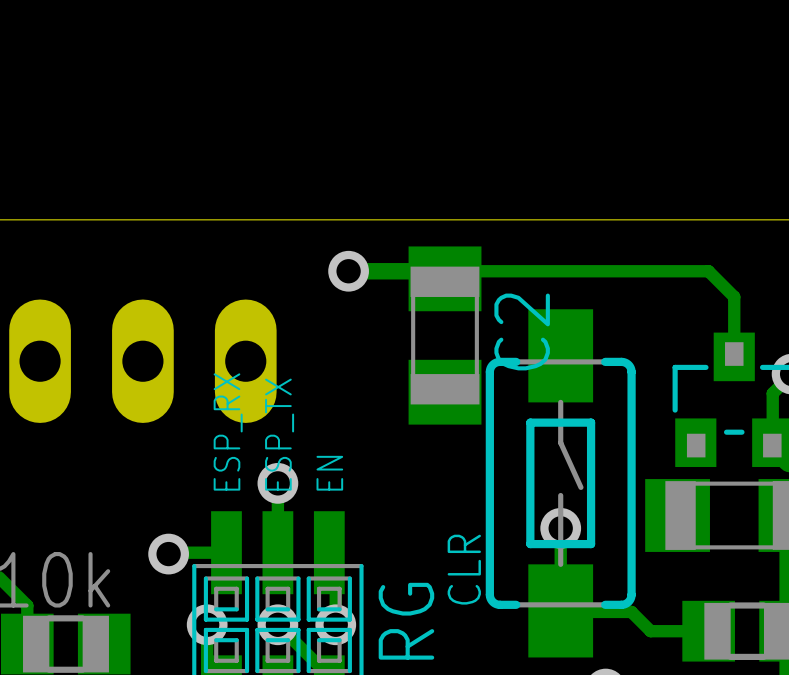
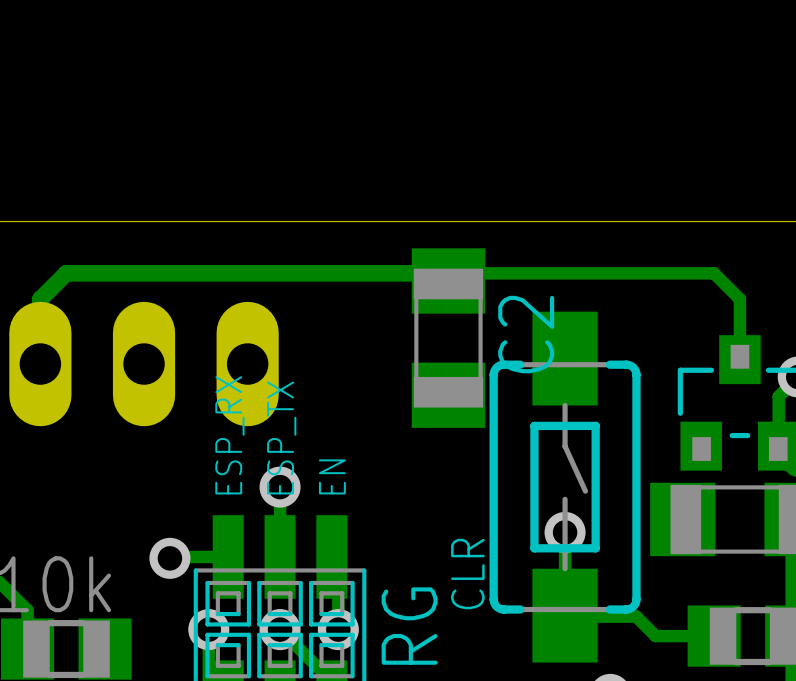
track: none -> (351, 273) (66, 273) (40, 299) (40, 364)
via: (348, 271) -> none

